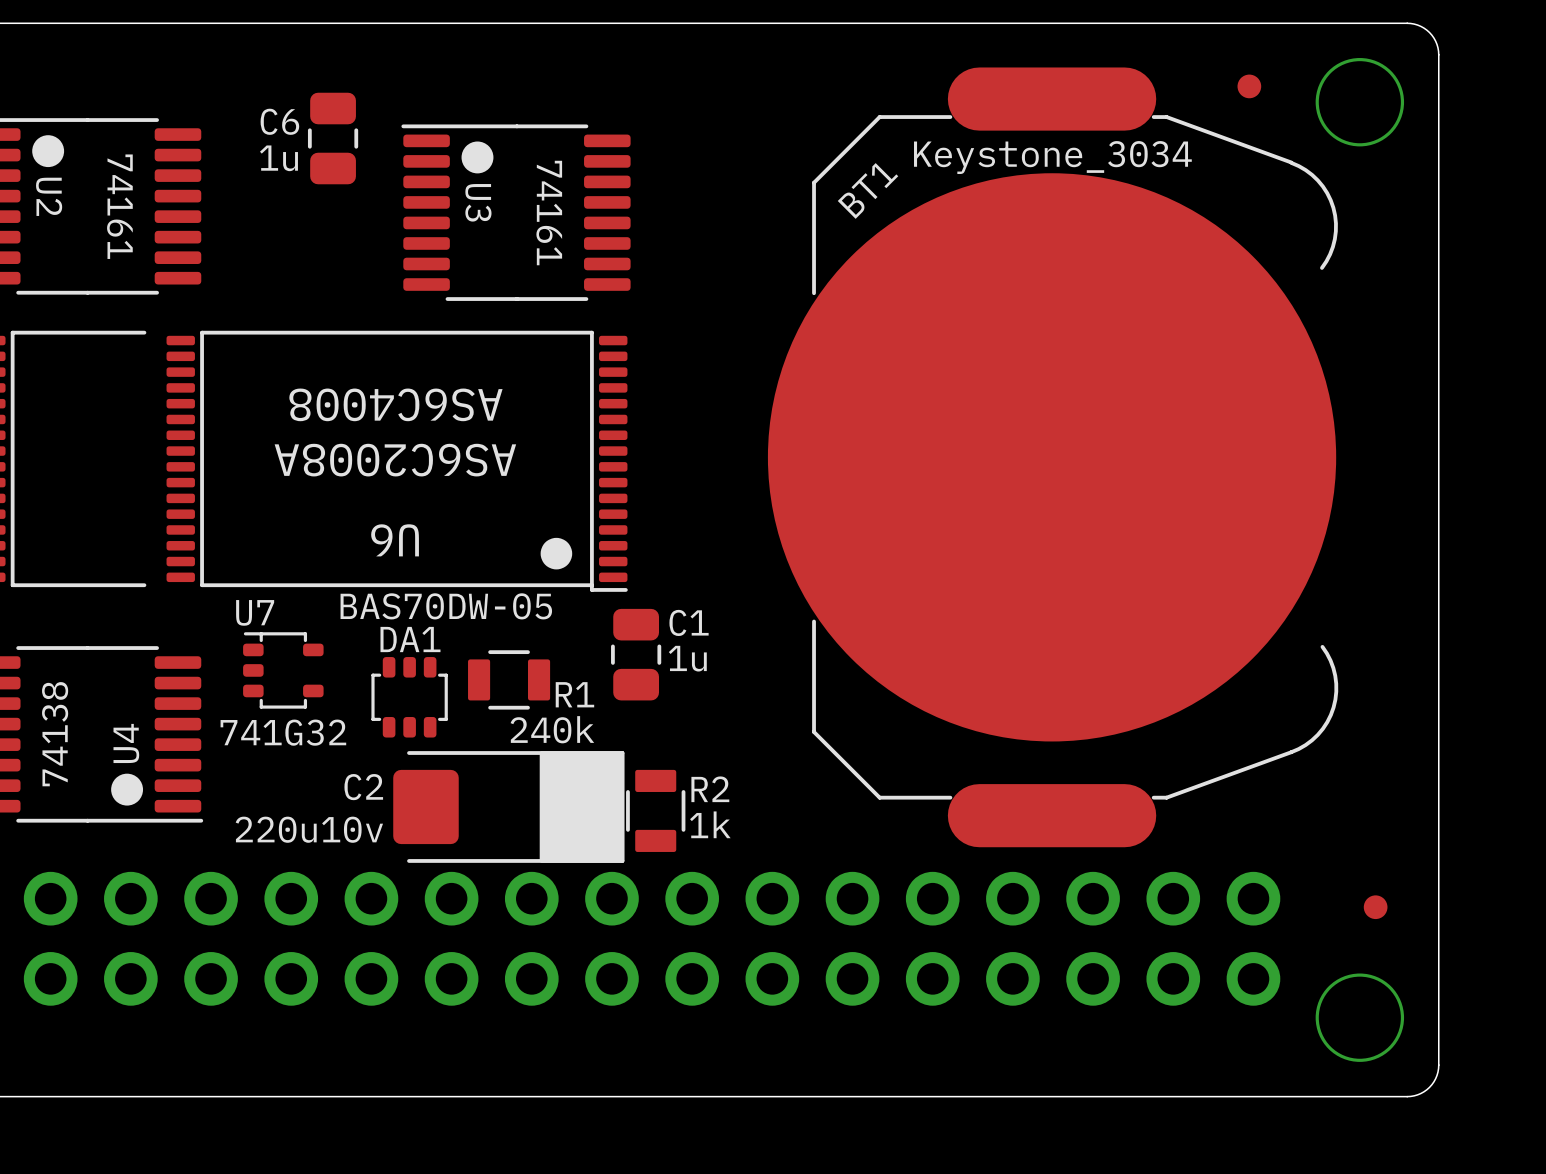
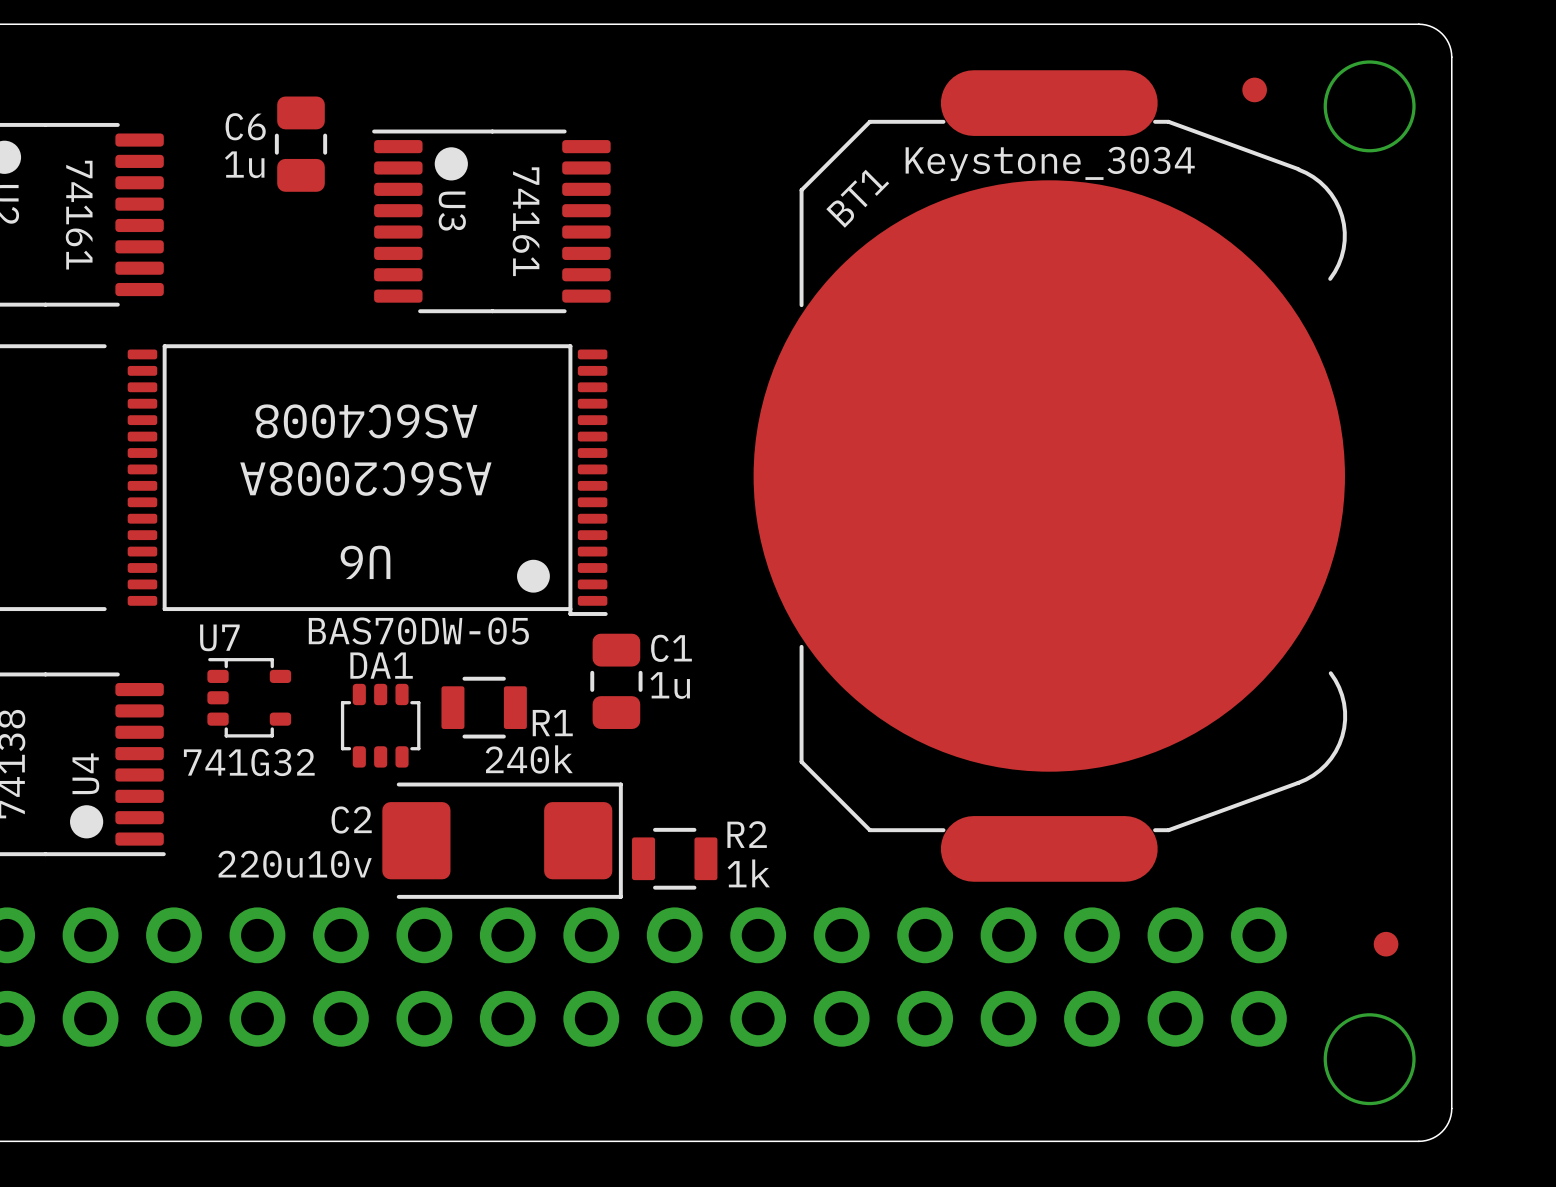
C2 footprint: [393, 751, 625, 863] -> [382, 782, 623, 899]
R2 rotation: 0° (655, 810) -> 90° clockwise (674, 858)

